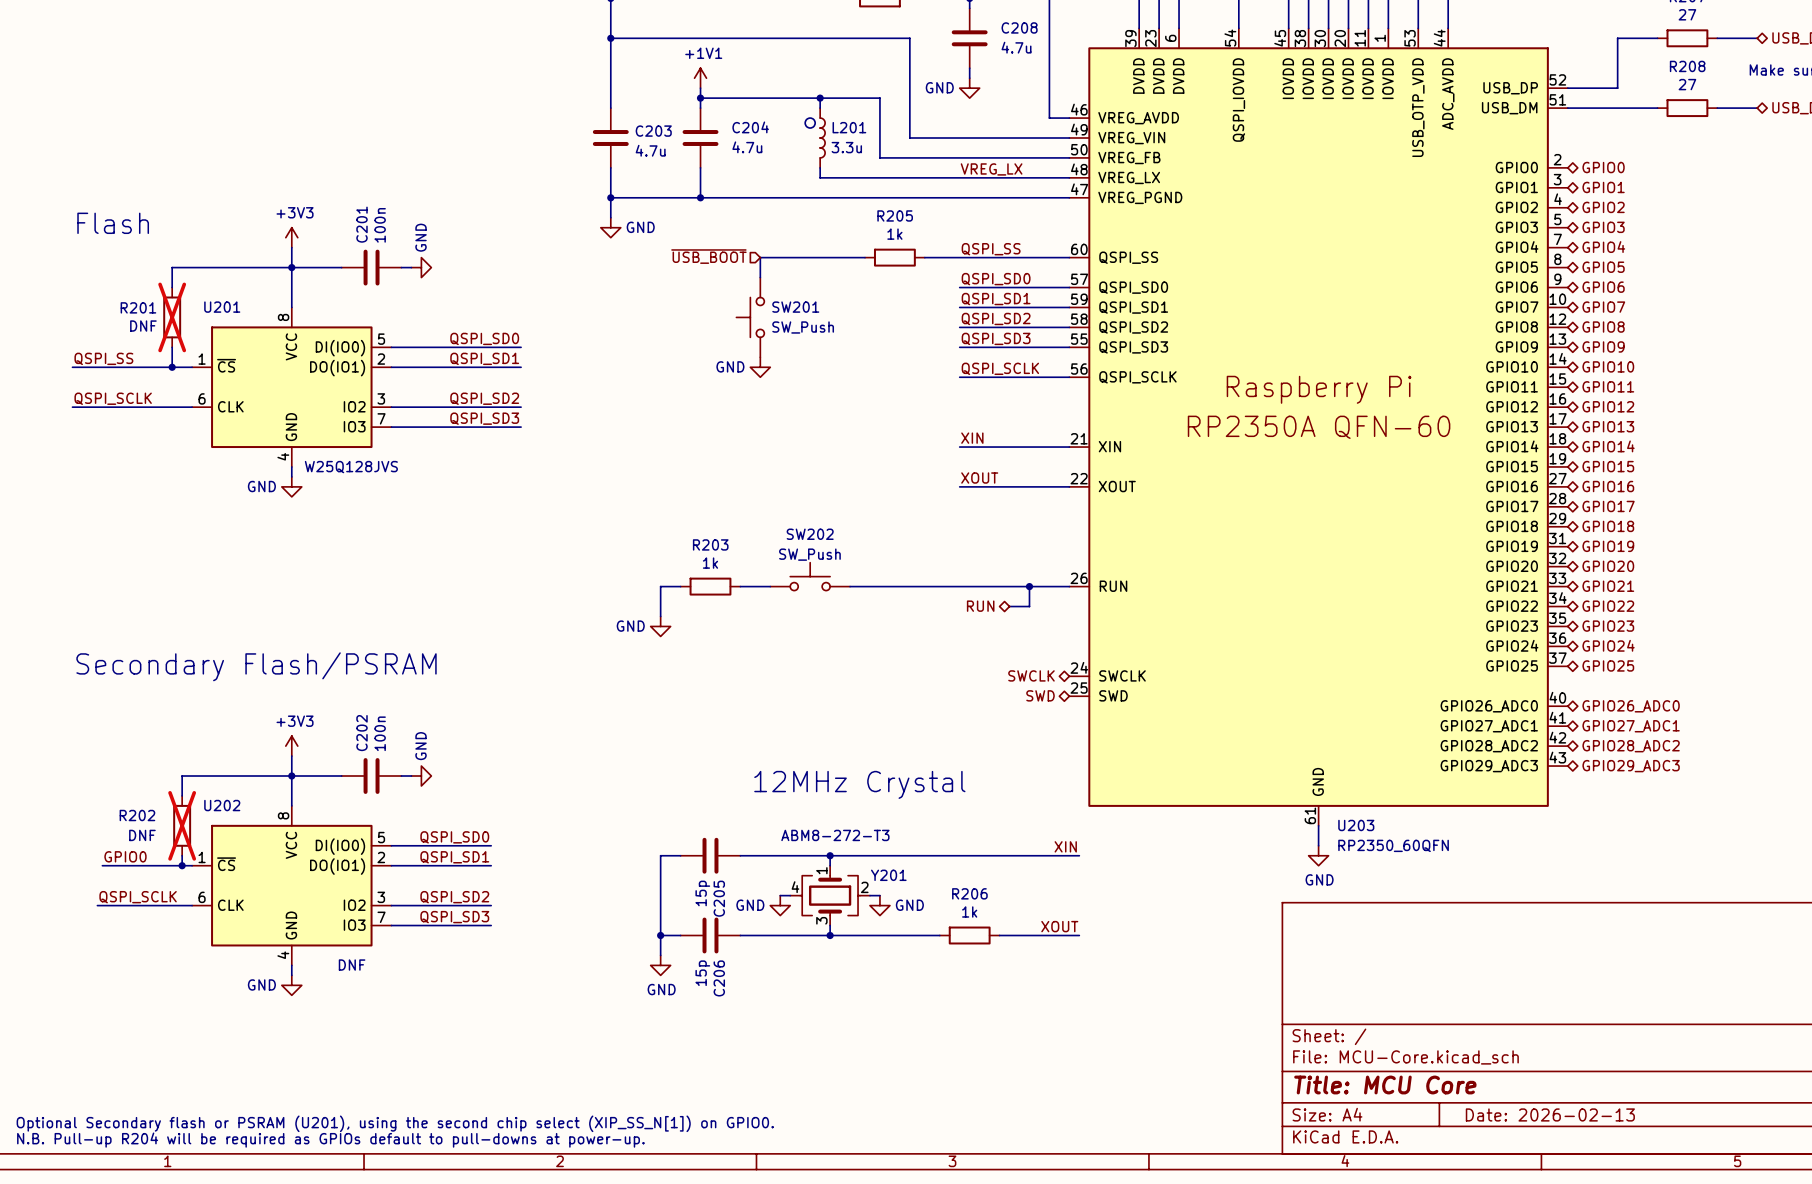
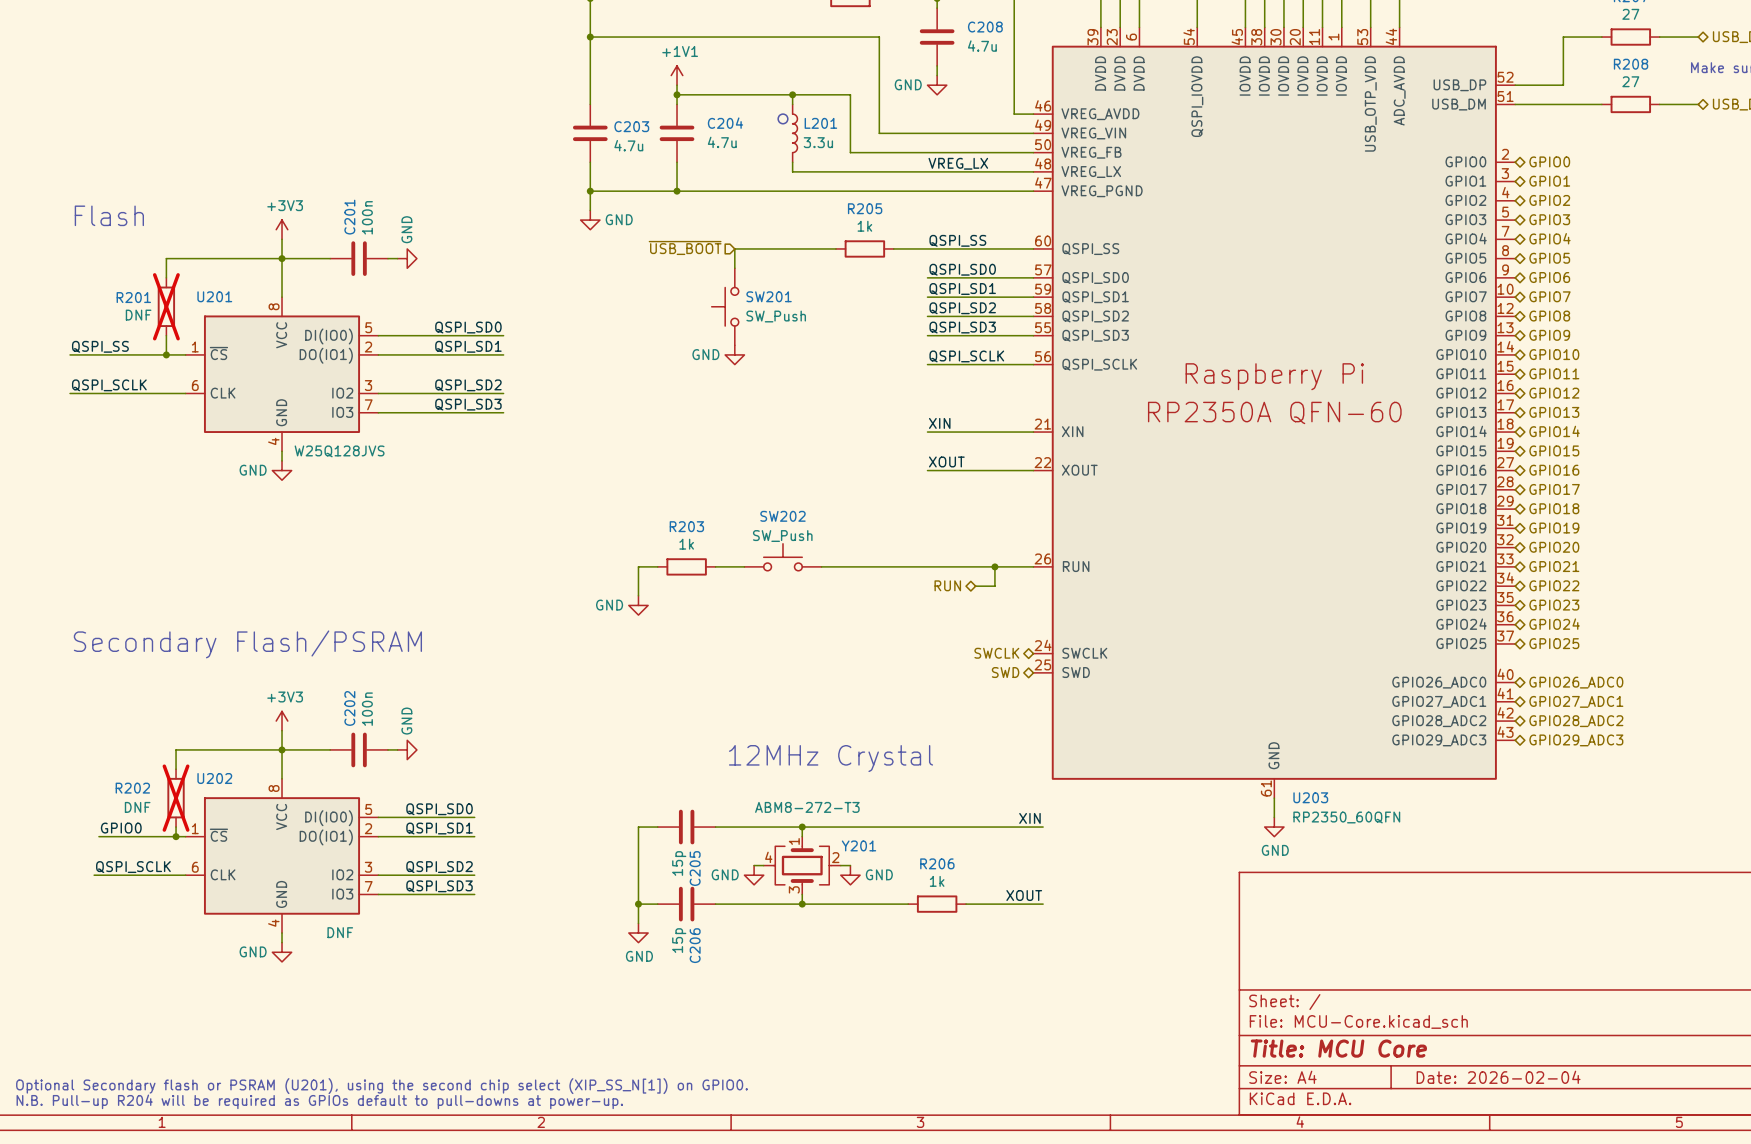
title block: Date: 2026-02-13 (1550, 1114) -> Date: 2026-02-04 (1498, 1077)

